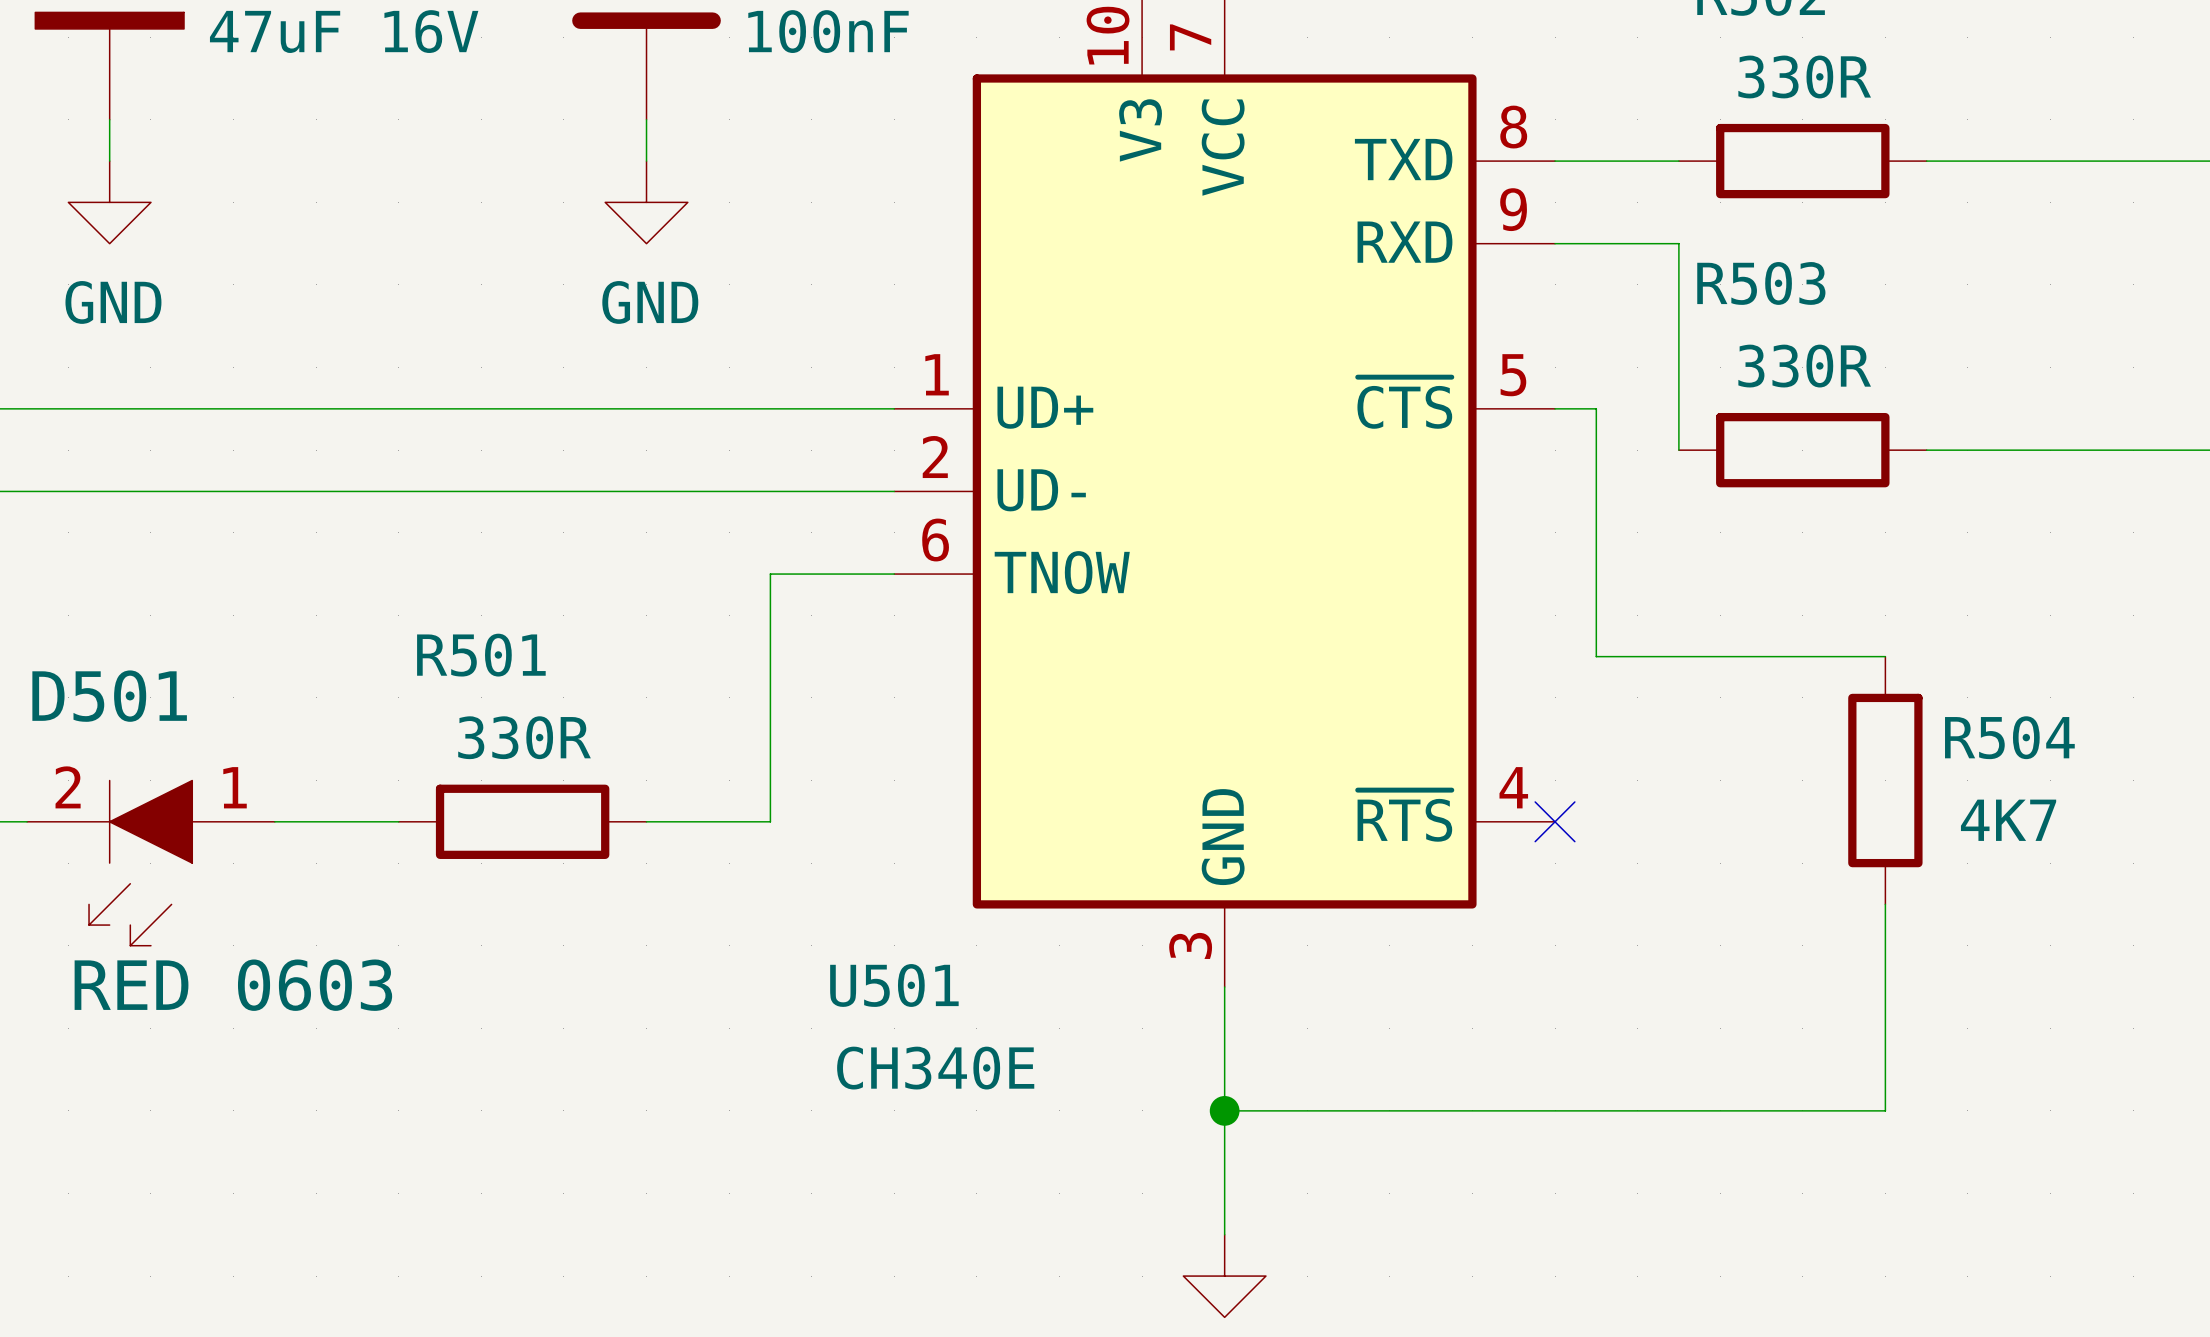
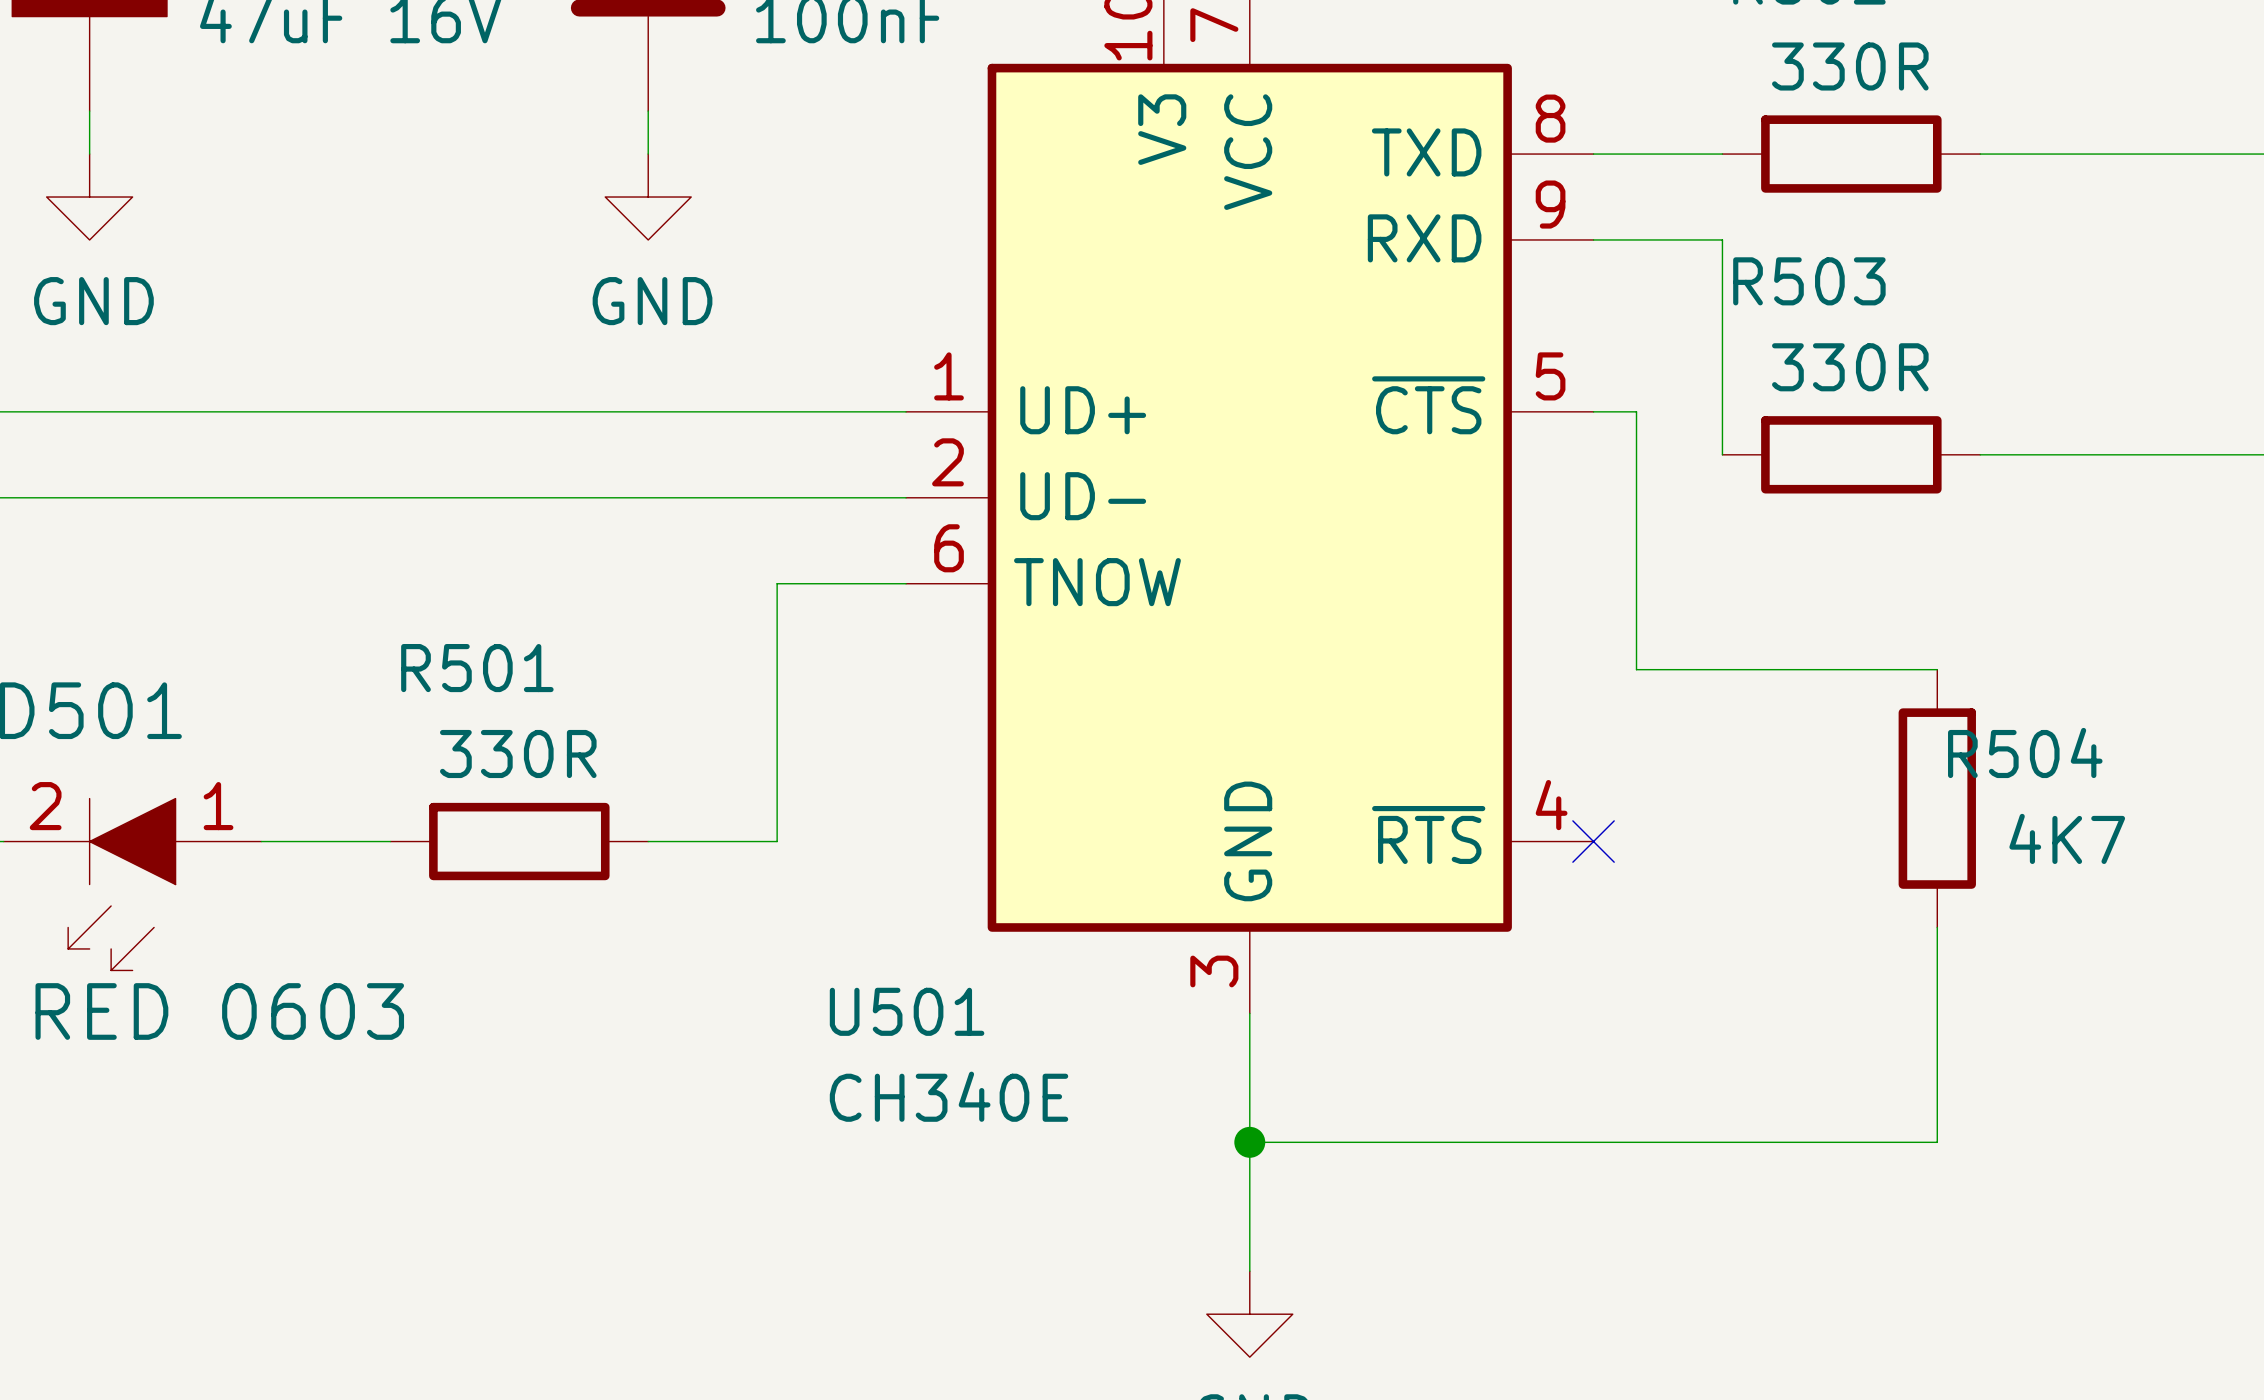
R504 name position: R504 (2009, 737) -> R504 (2025, 752)

